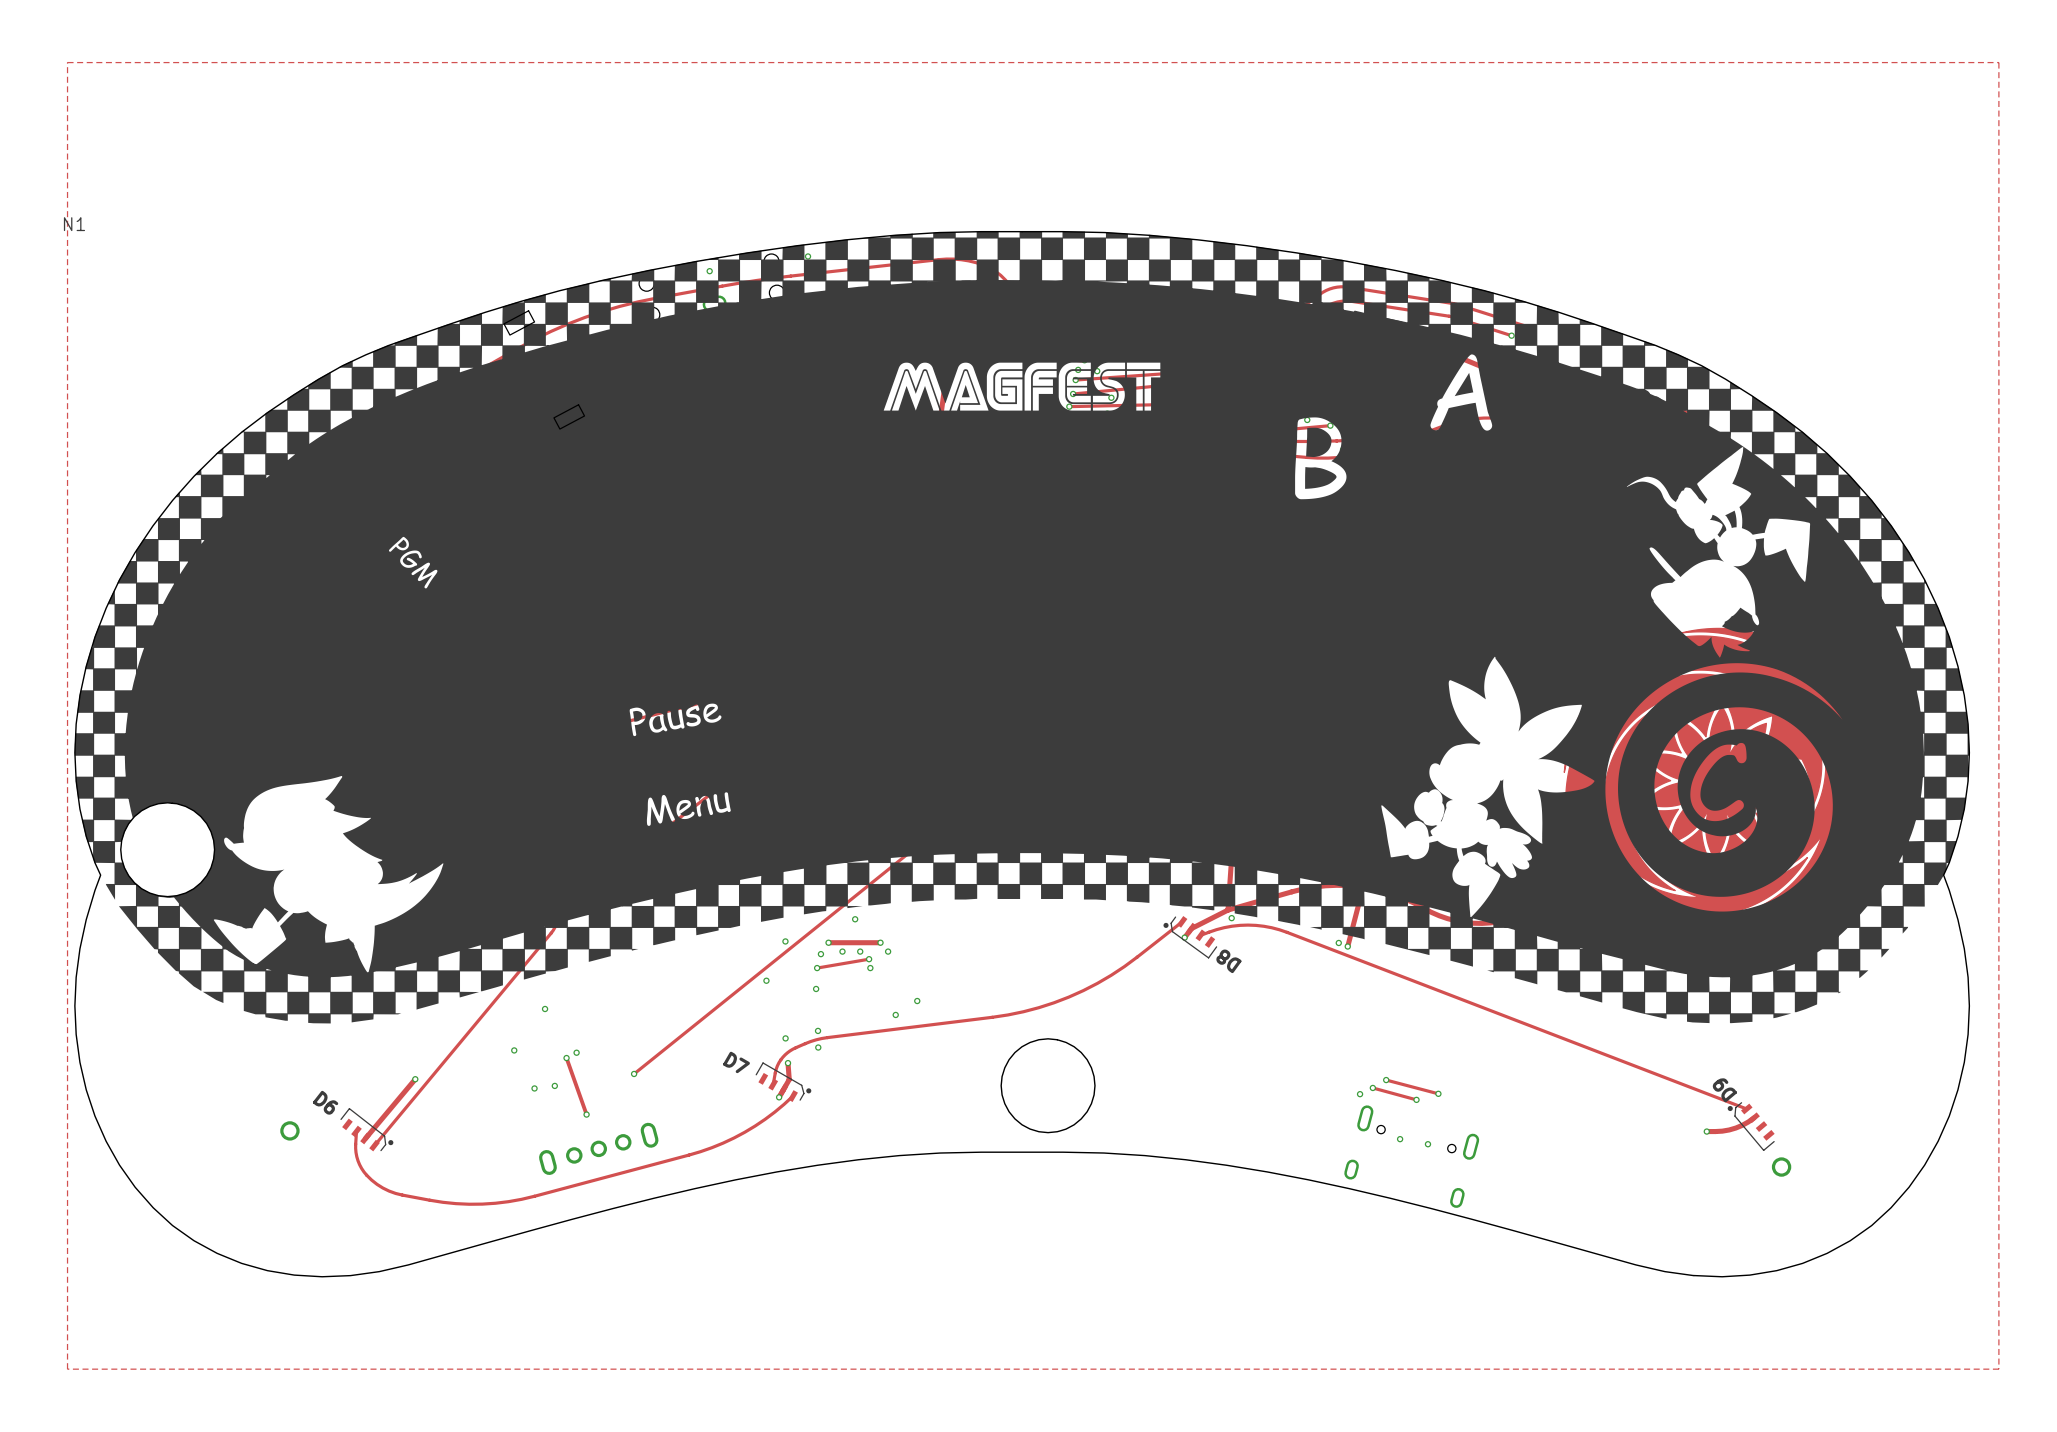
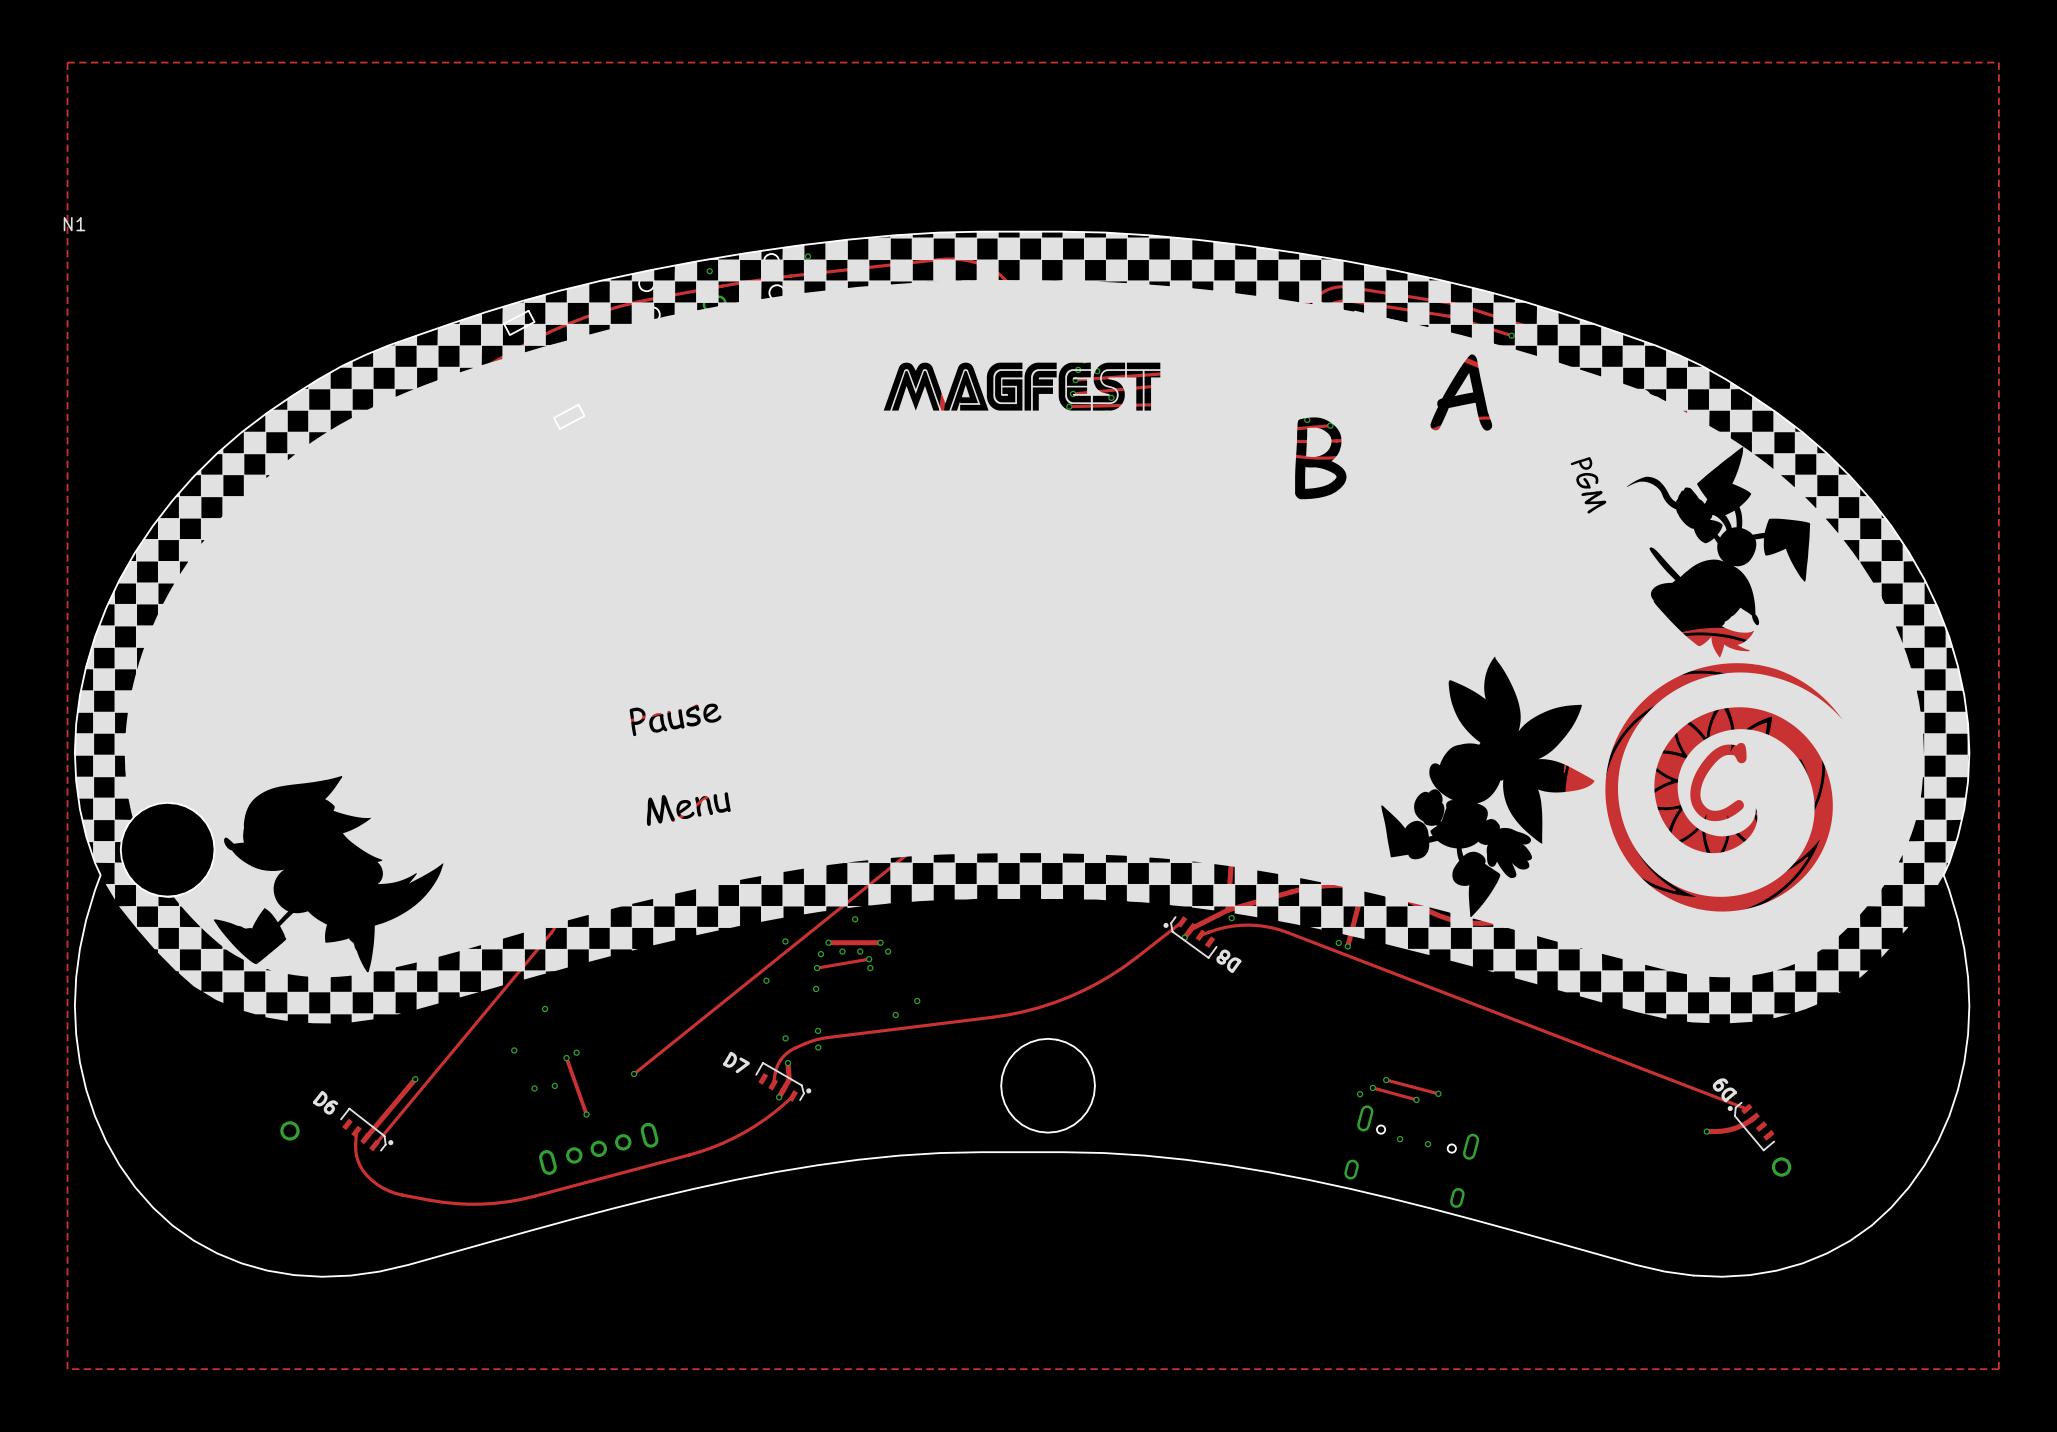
N1 footprint: [74, 230, 1971, 1278] -> [74, 230, 1971, 1278]

